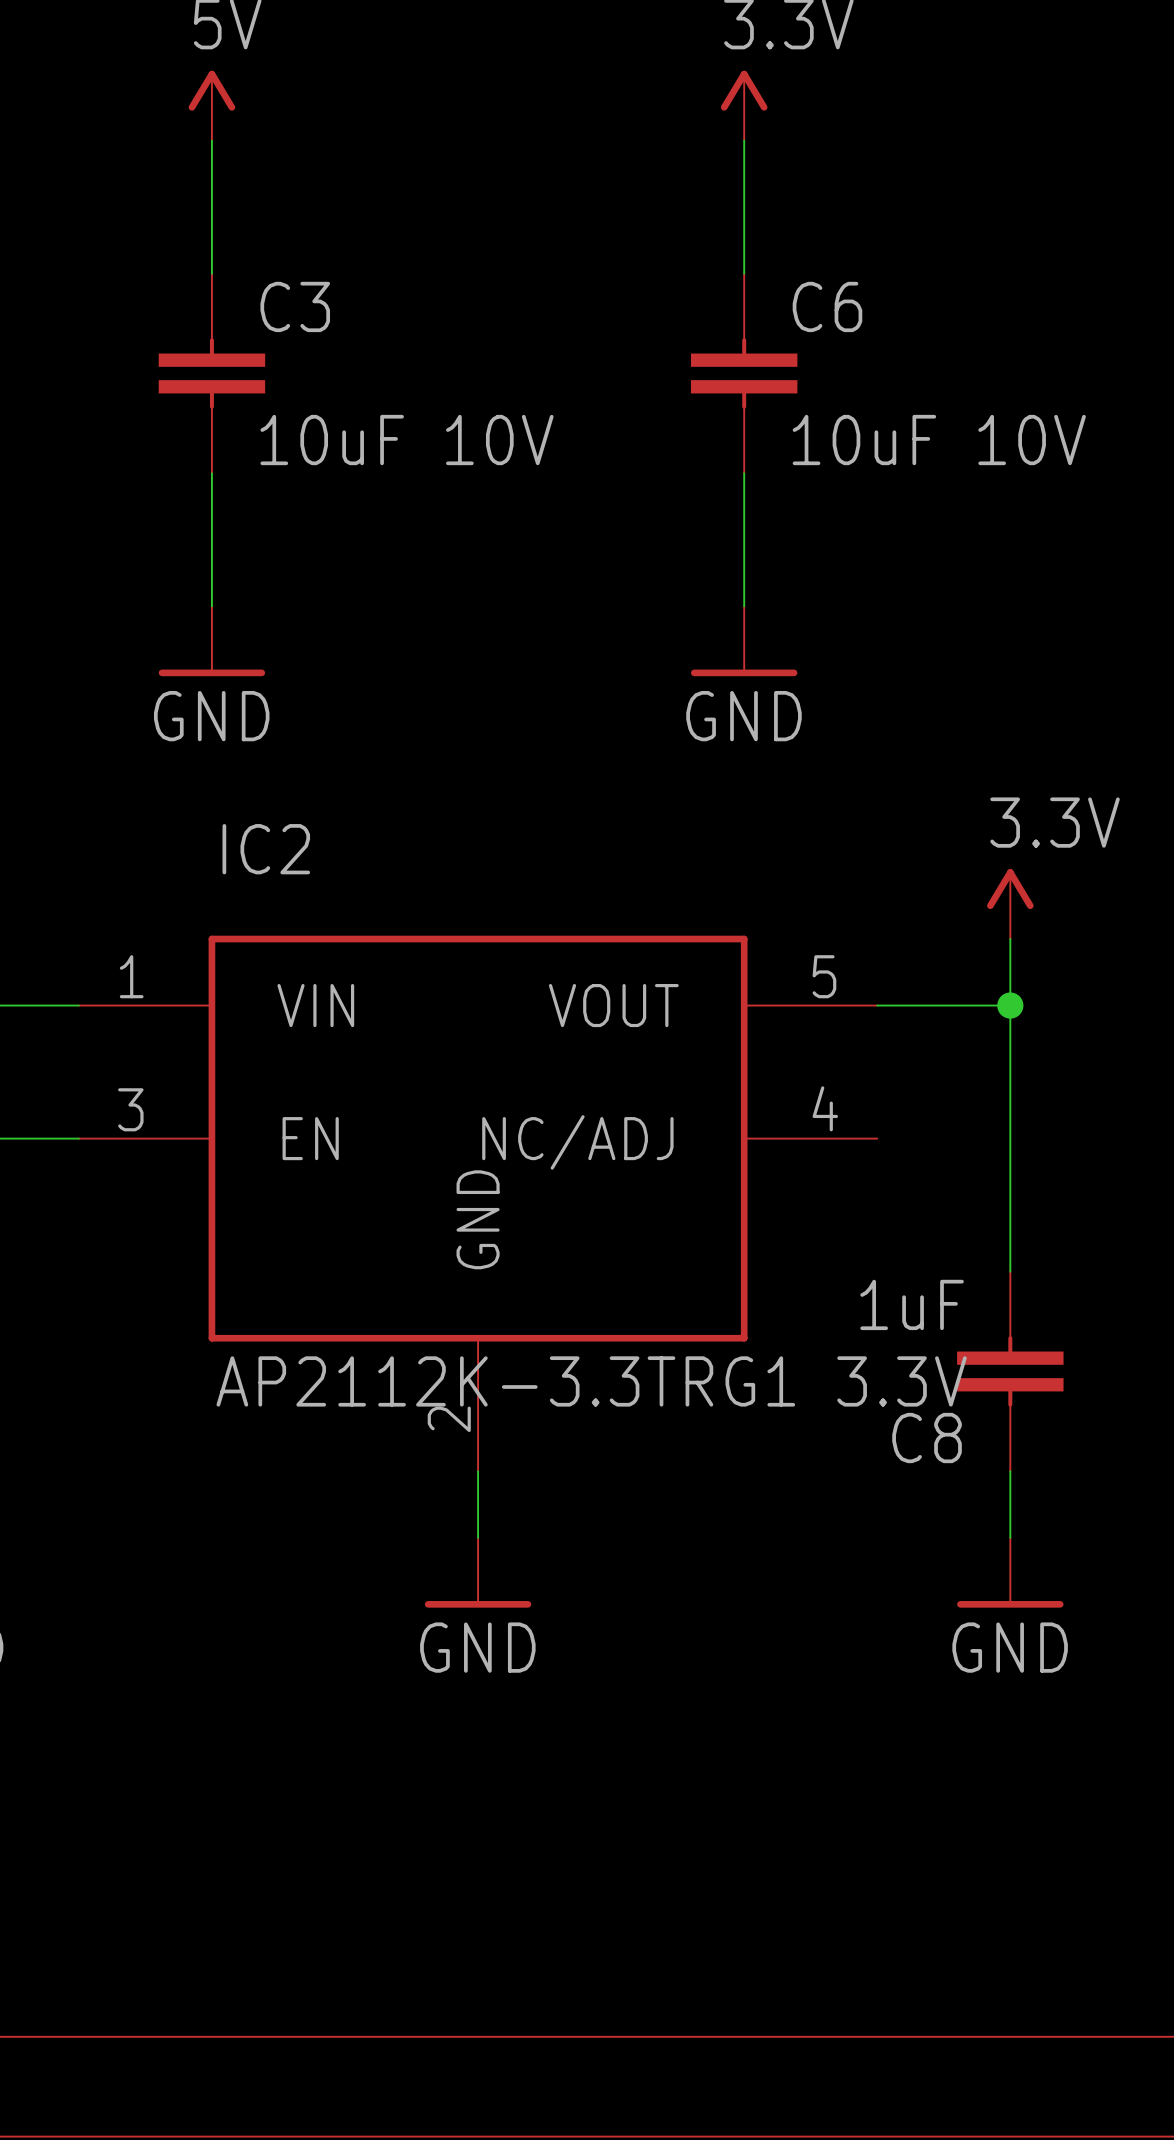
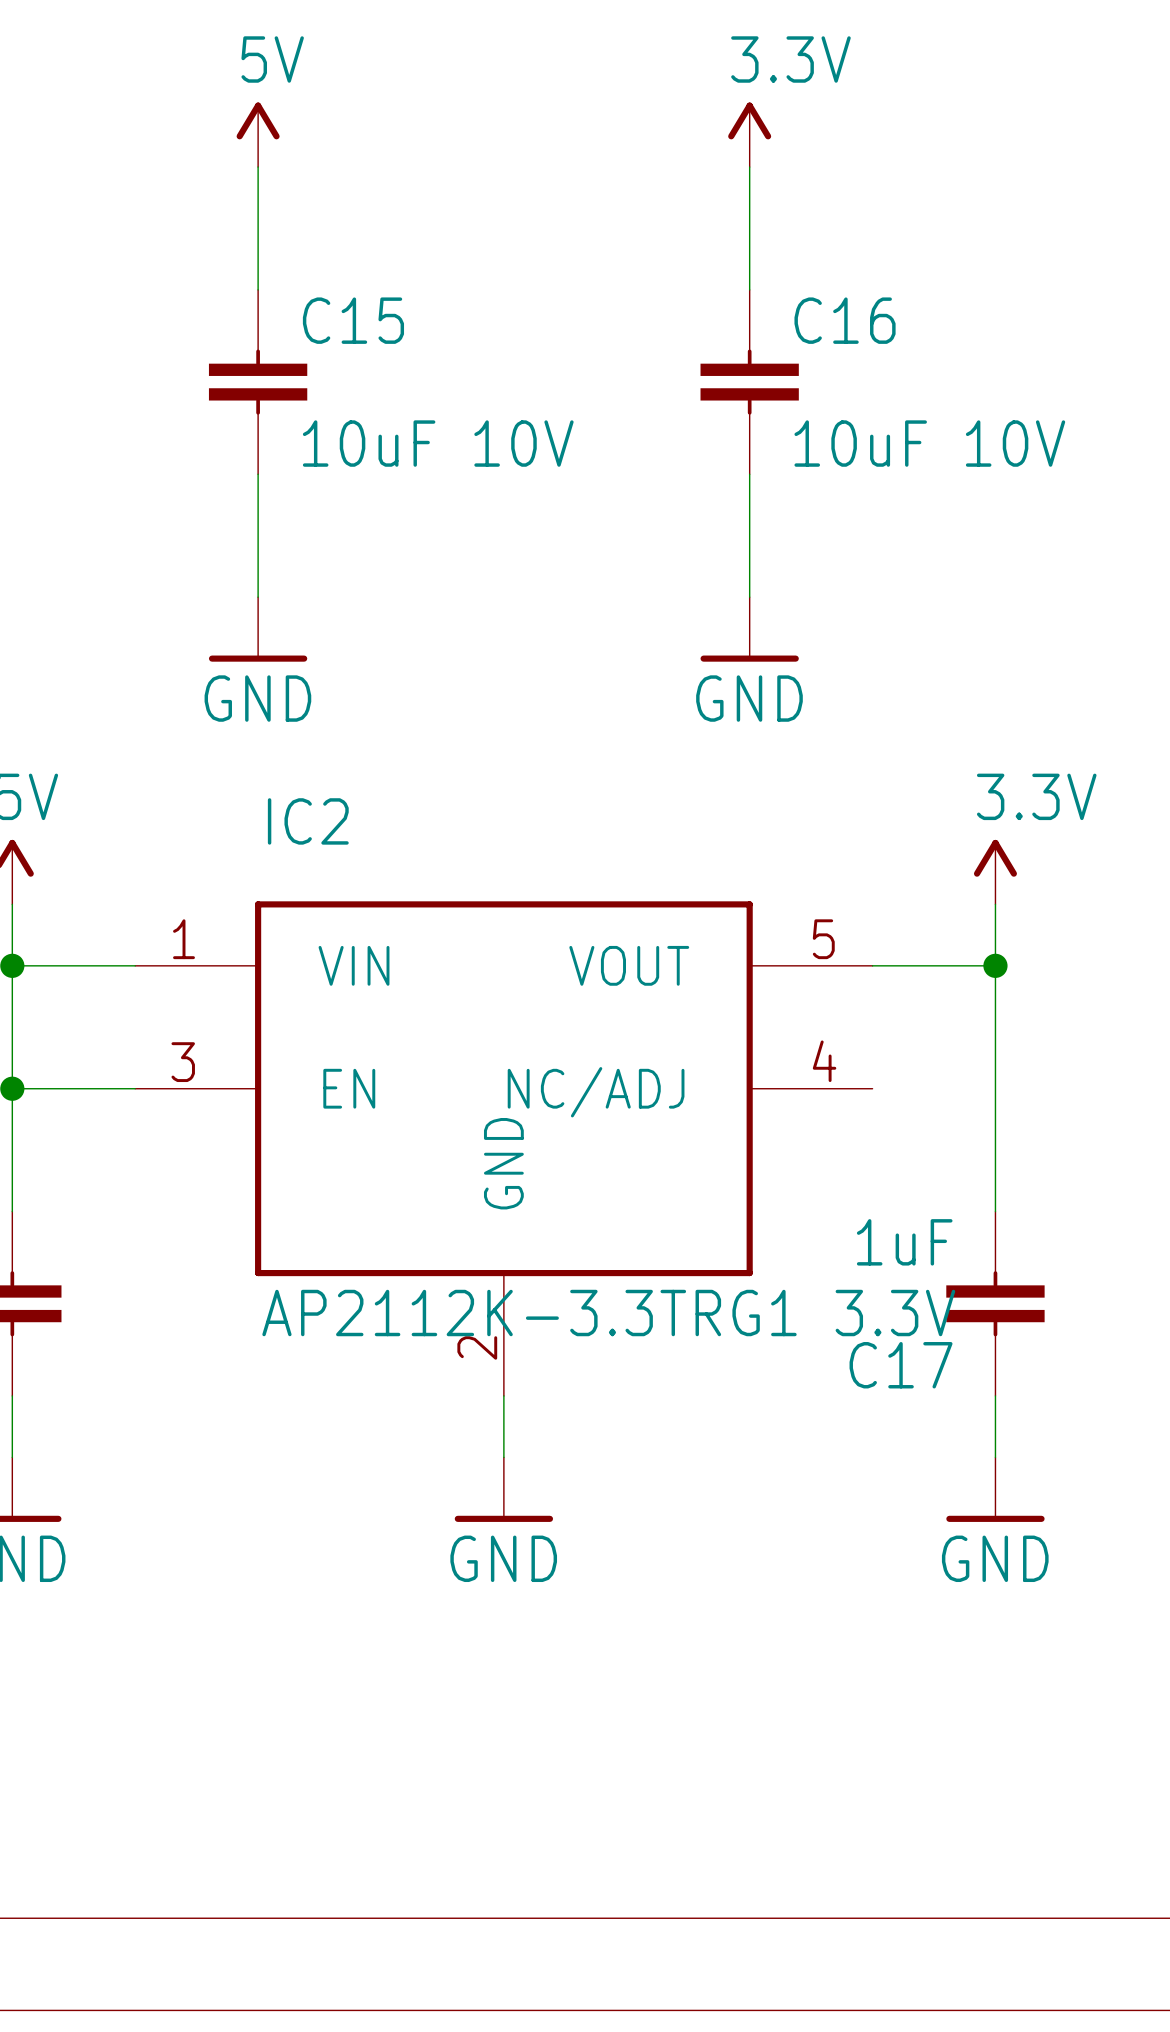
C3 name: C3 (295, 306) -> C15 (353, 320)
C6 name: C6 (827, 306) -> C16 (845, 320)
C8 name: C8 (927, 1438) -> C17 (901, 1365)

